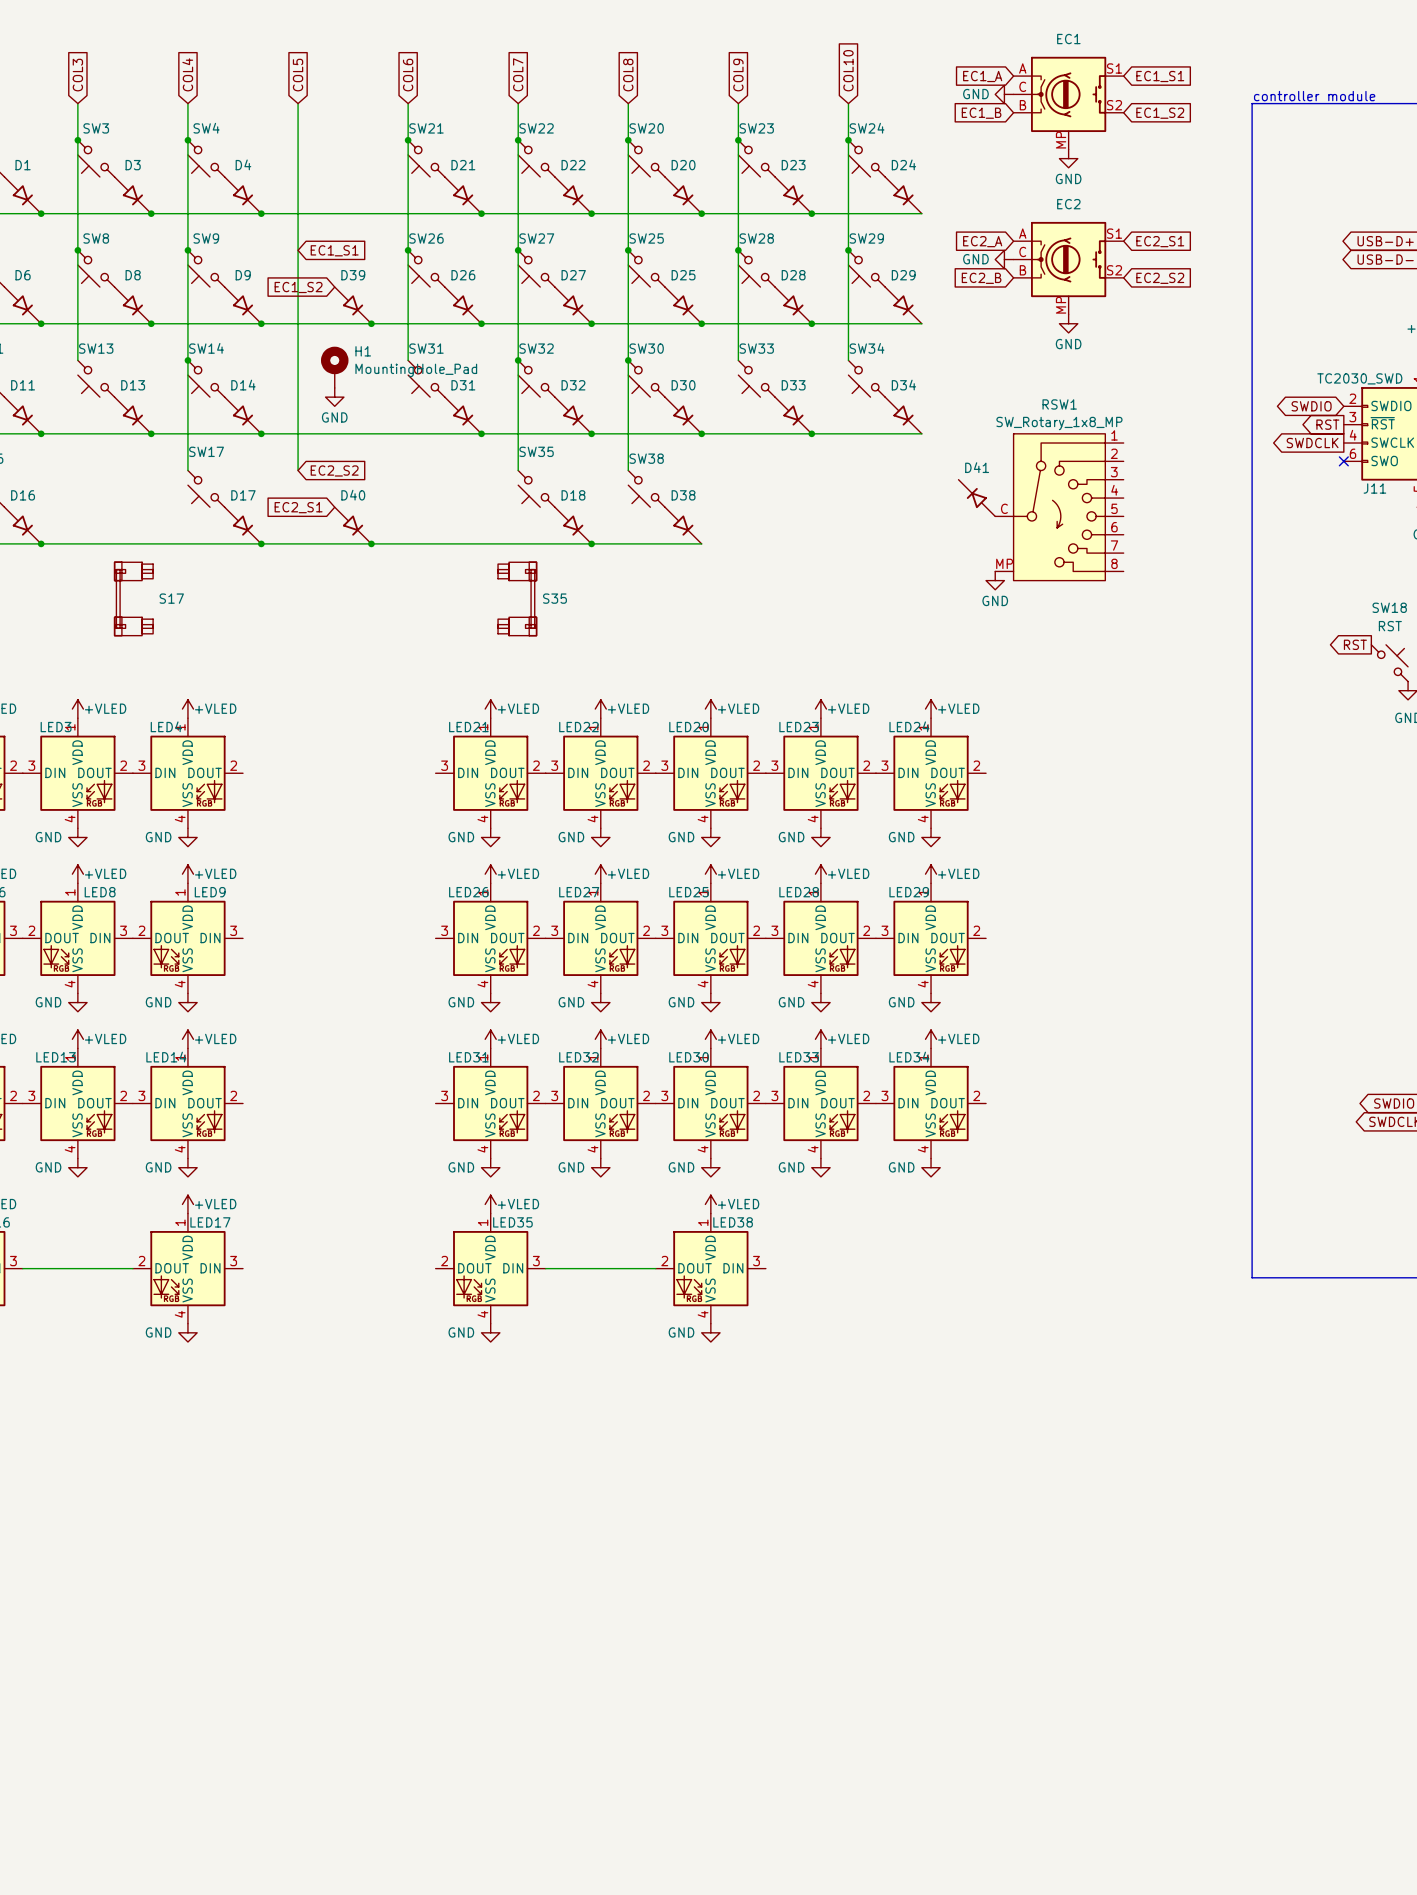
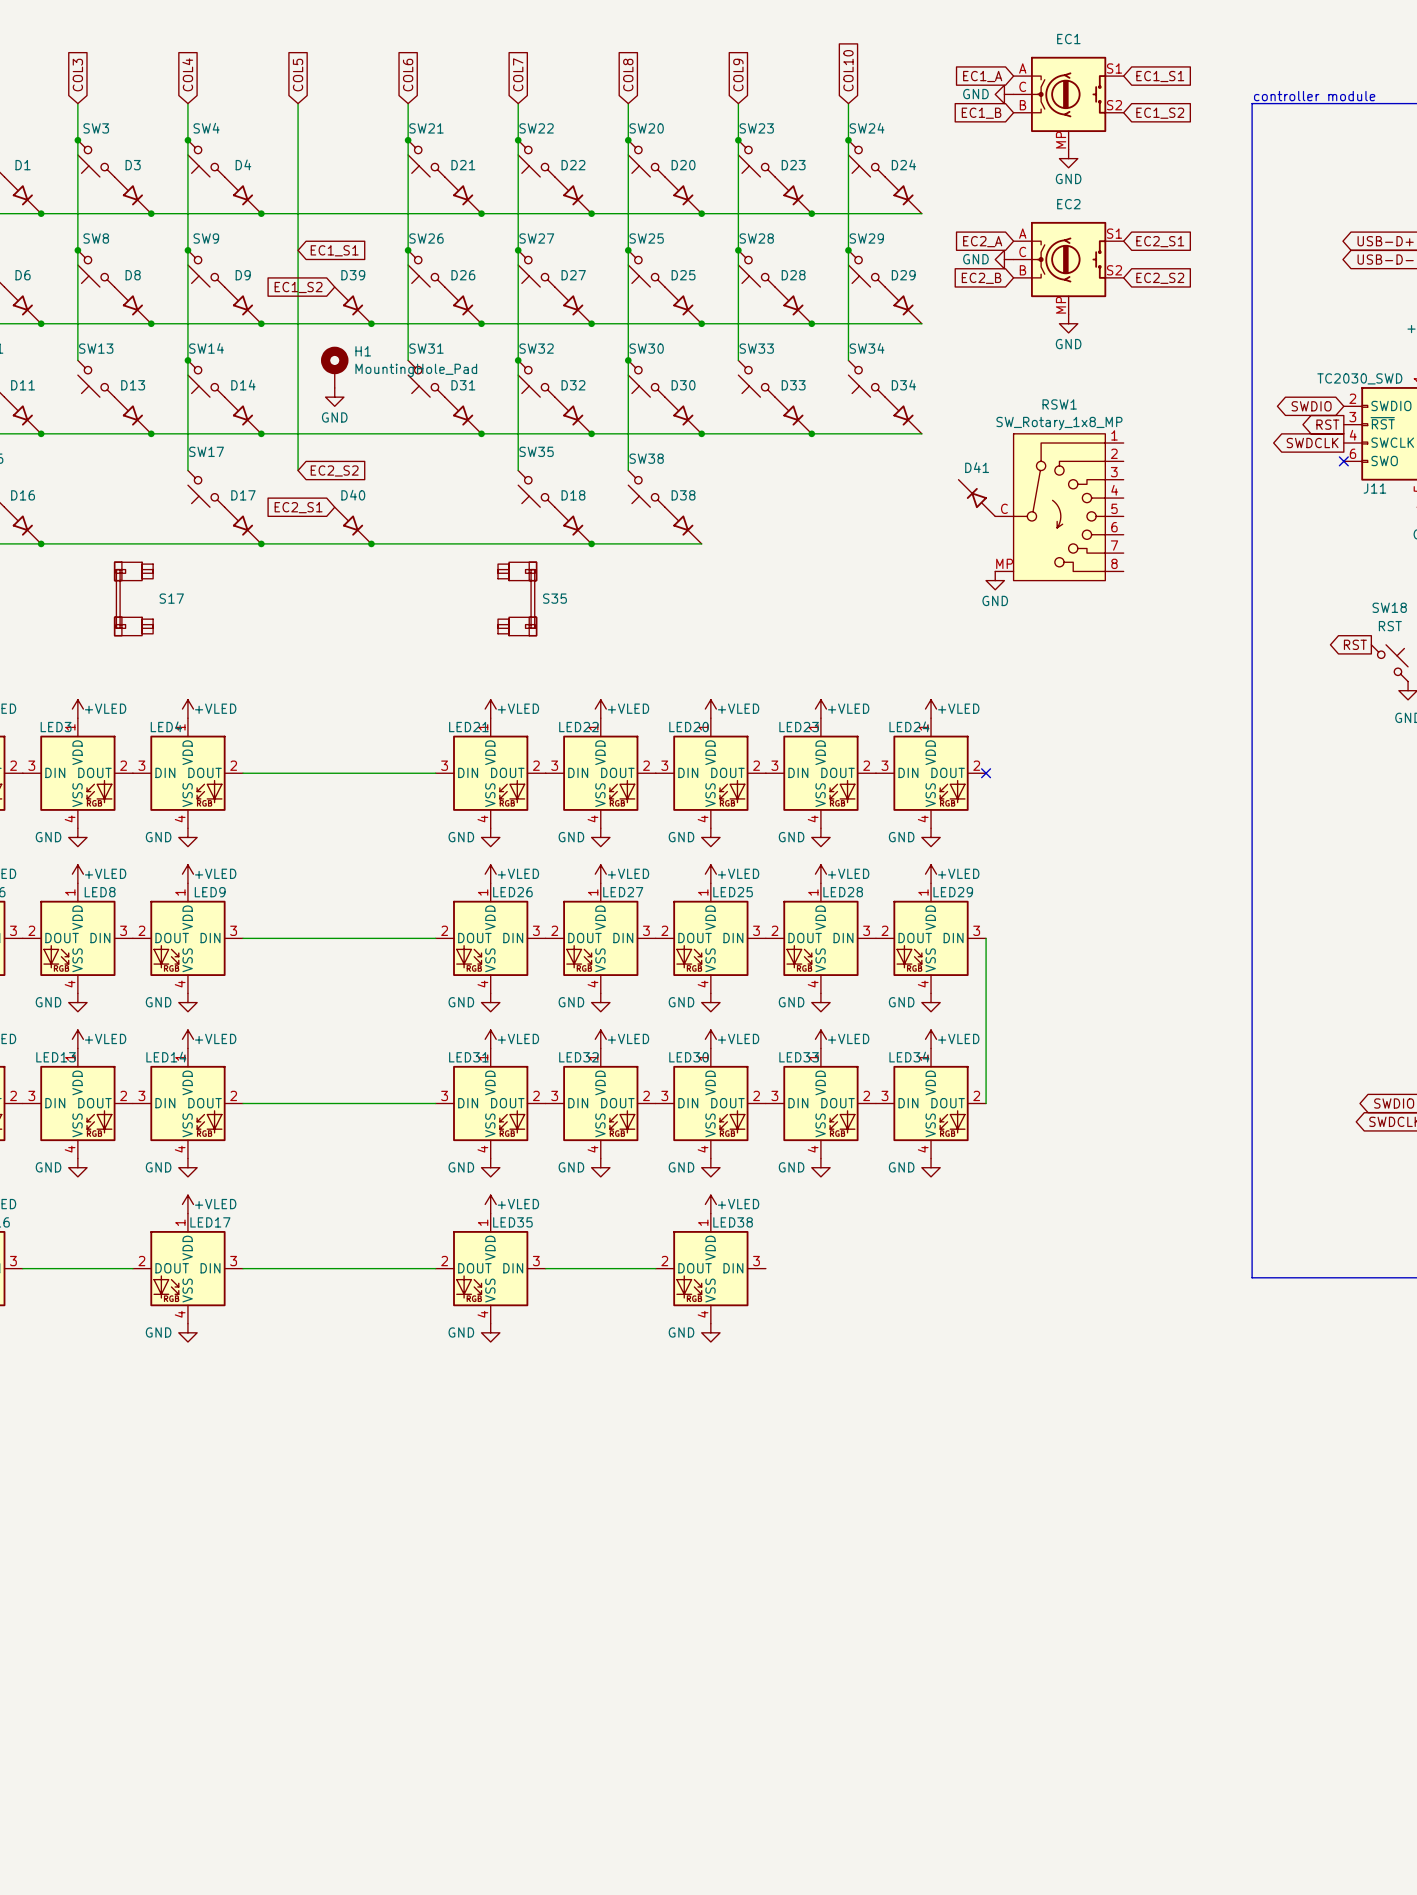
wire: none -> (243, 773) (435, 773)
no-connect mark: none -> (986, 773)
wire: none -> (243, 938) (435, 938)
LED26 flip: as is (490, 938) -> left-right (490, 938)
LED27 flip: as is (600, 938) -> left-right (600, 938)
LED25 flip: as is (710, 938) -> left-right (710, 938)
LED28 flip: as is (820, 938) -> left-right (820, 938)
LED29 flip: as is (931, 938) -> left-right (931, 938)
wire: none -> (986, 938) (986, 1103)
wire: none -> (243, 1103) (435, 1103)
wire: none -> (243, 1268) (435, 1268)

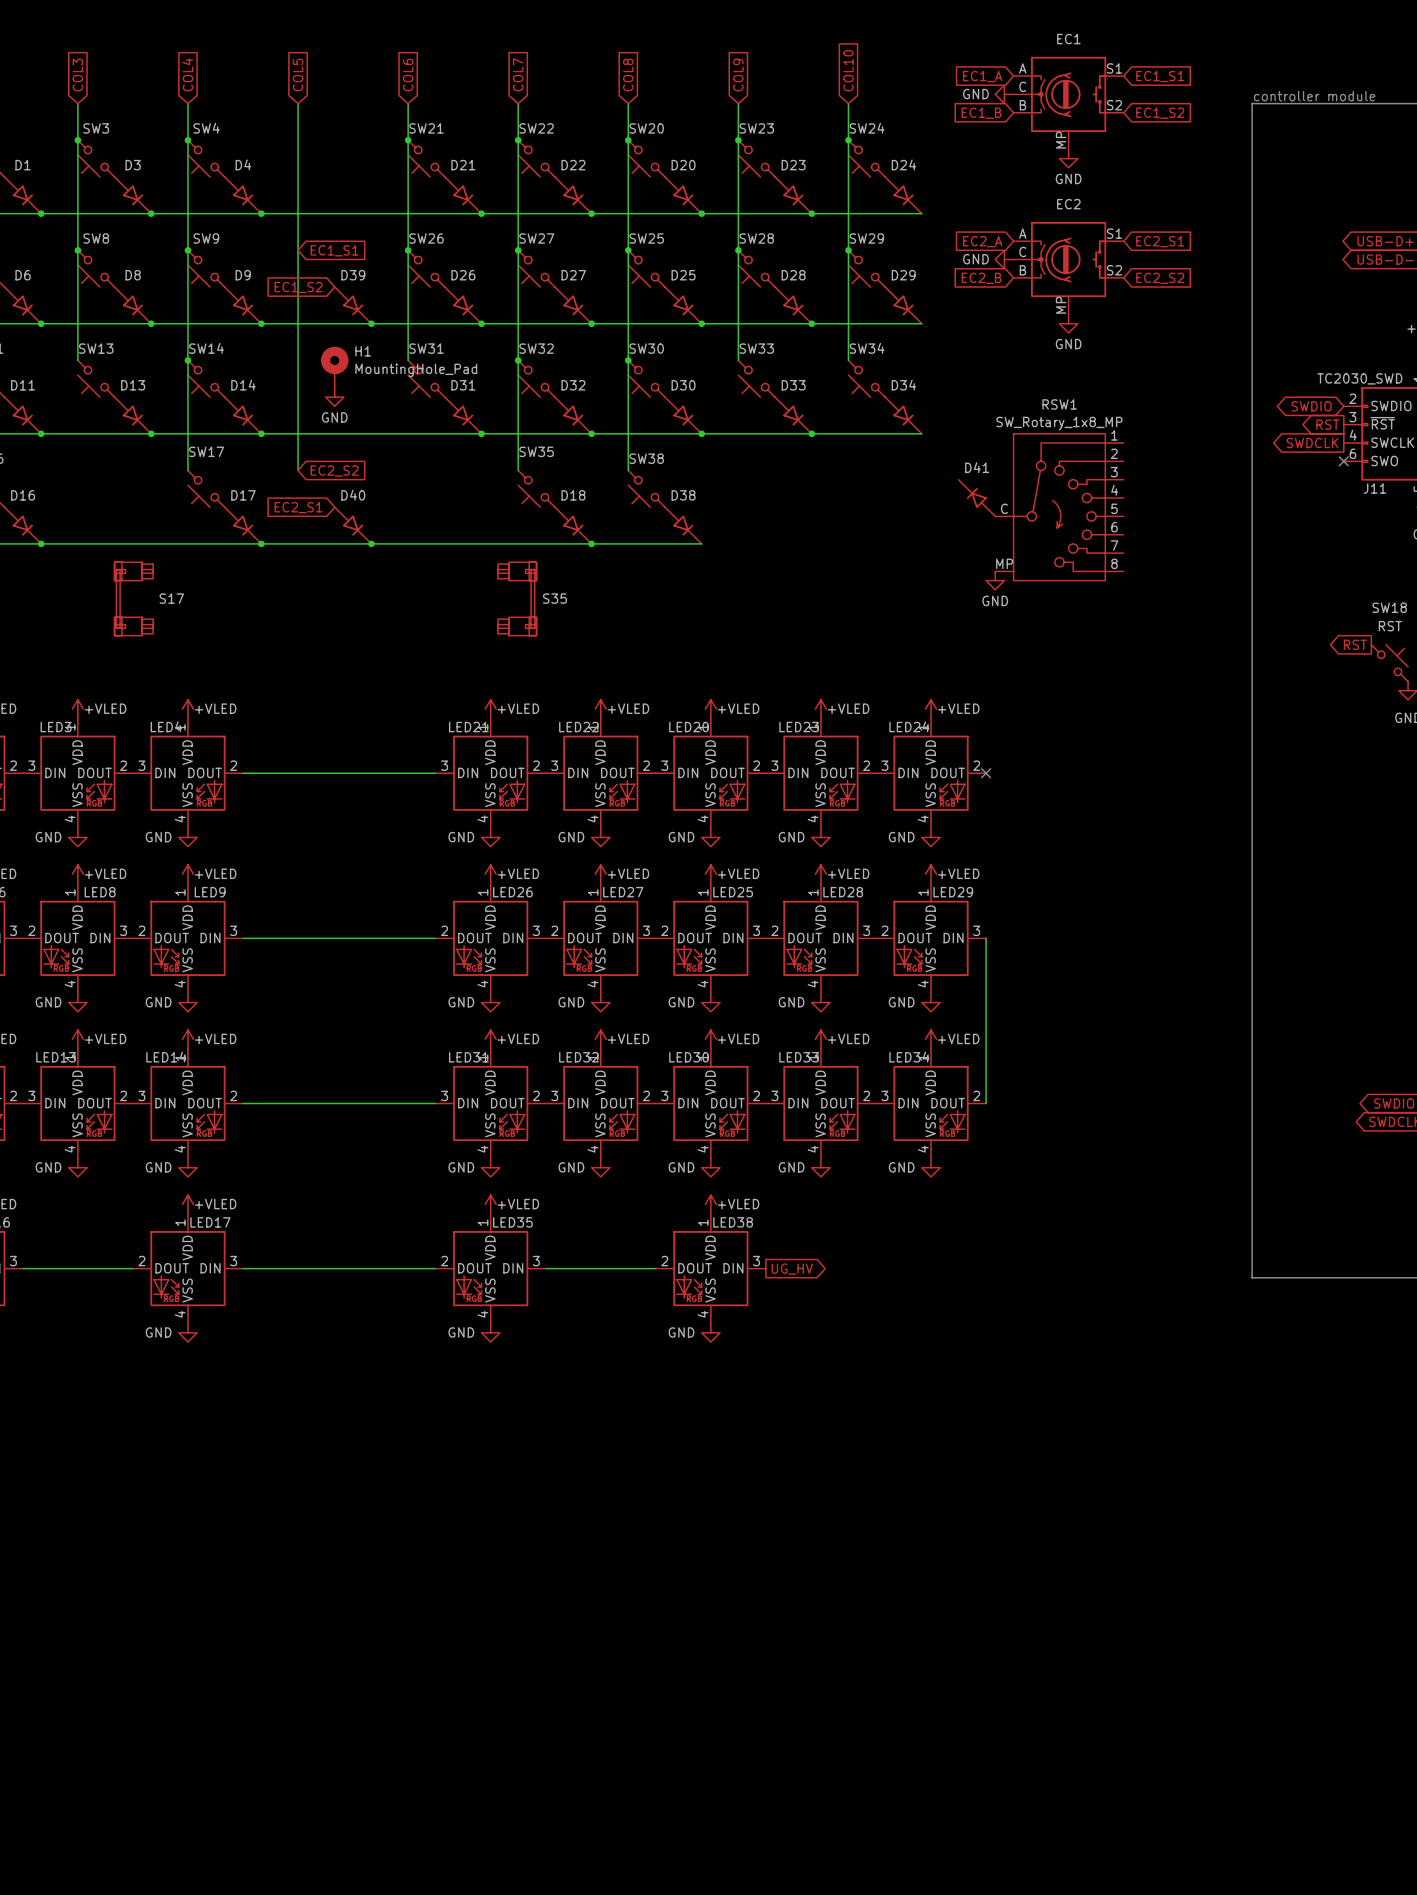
global label: none -> UG_HV (792, 1269)

